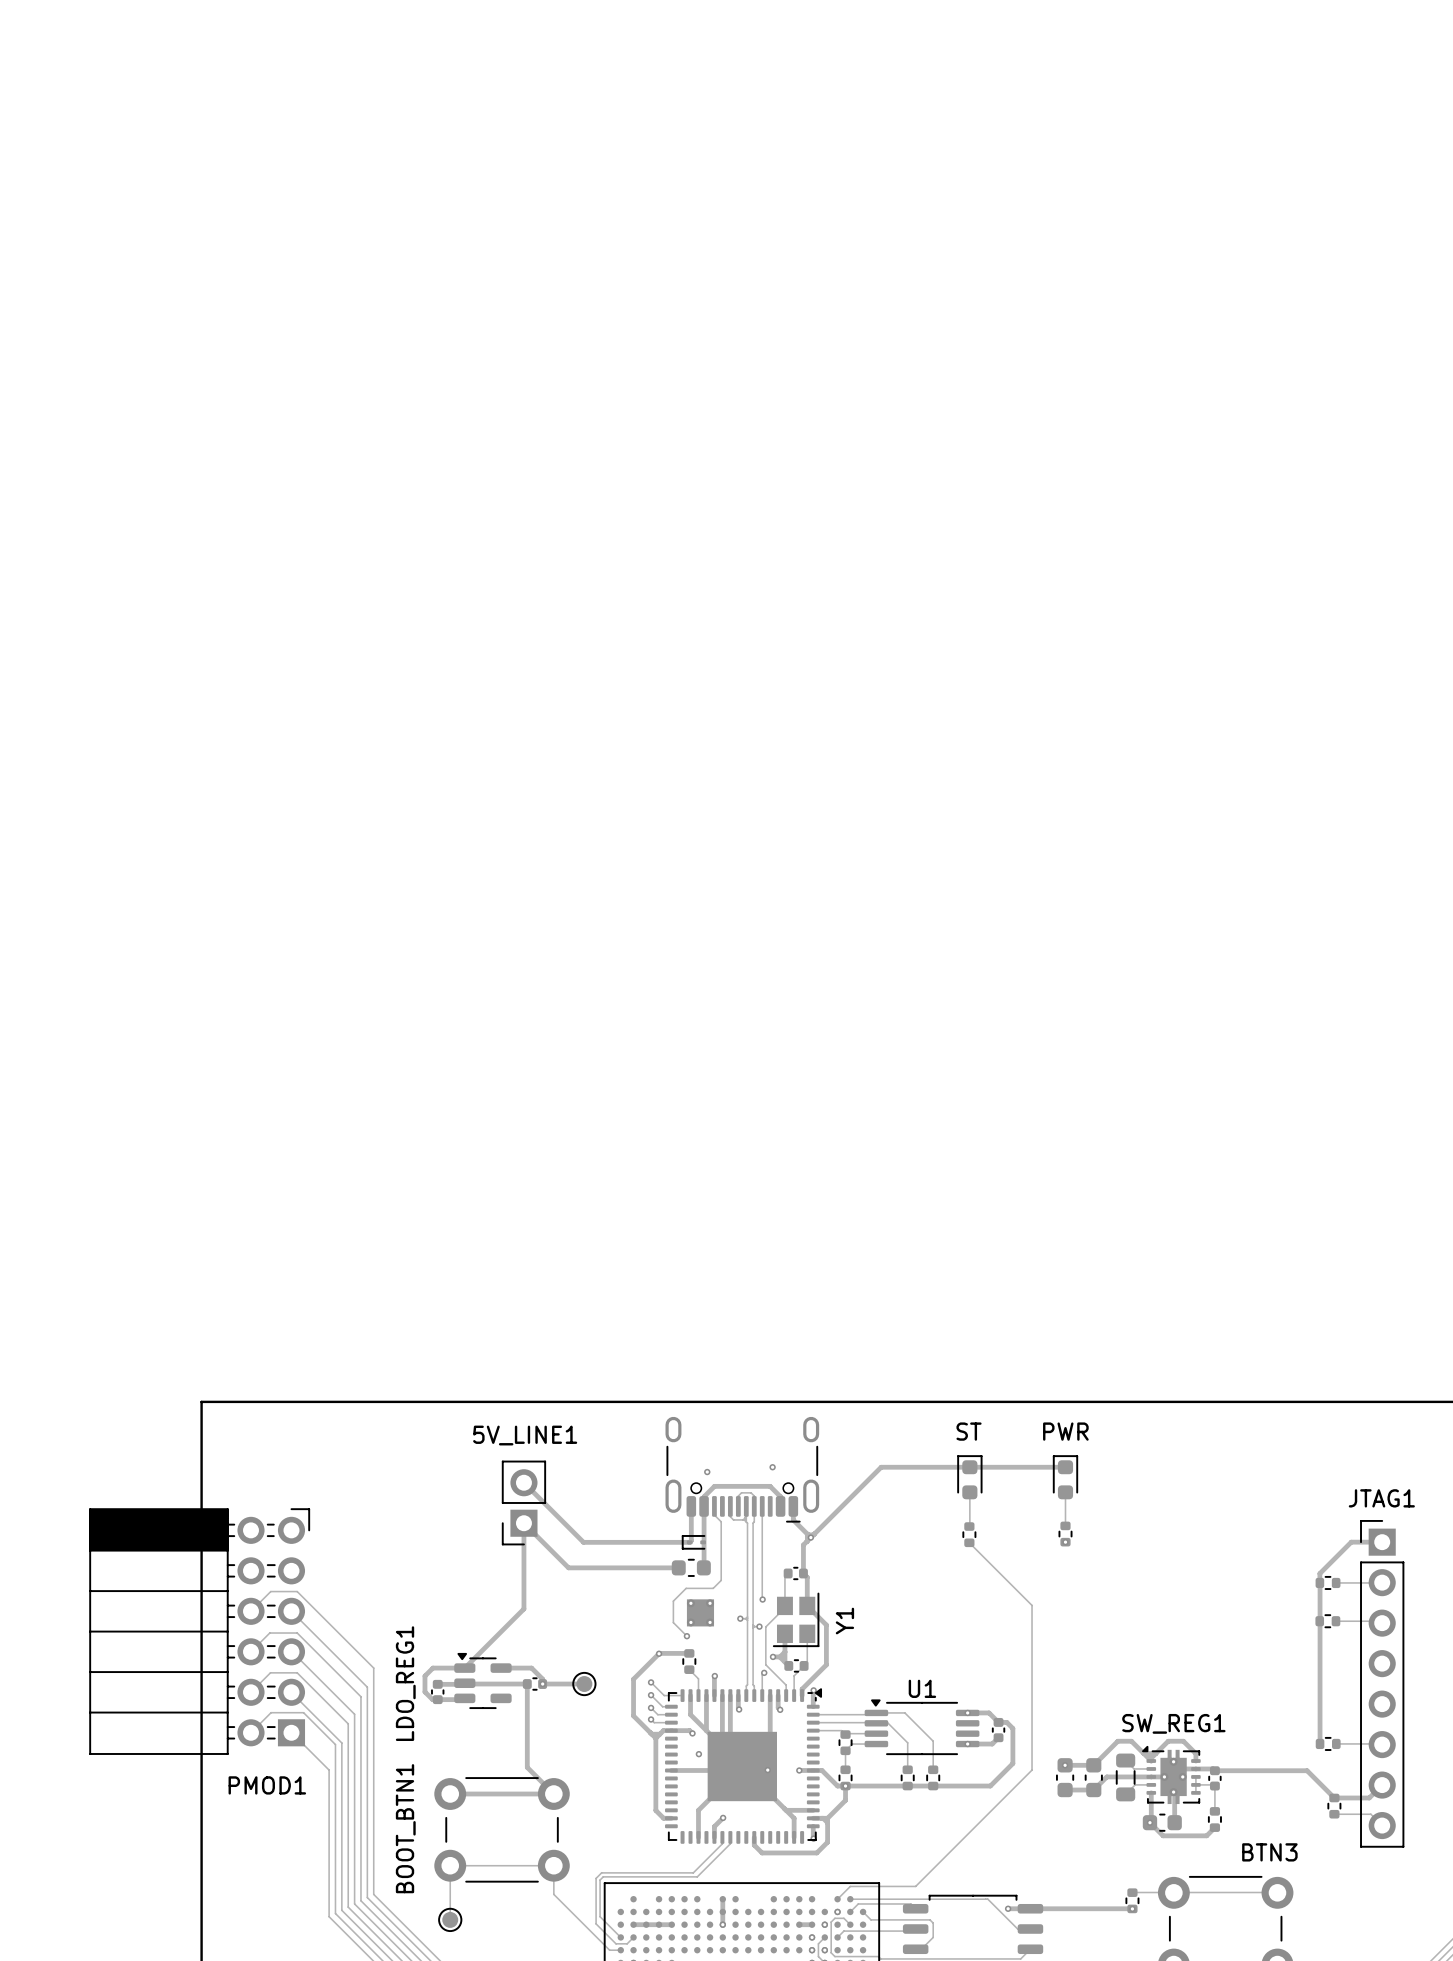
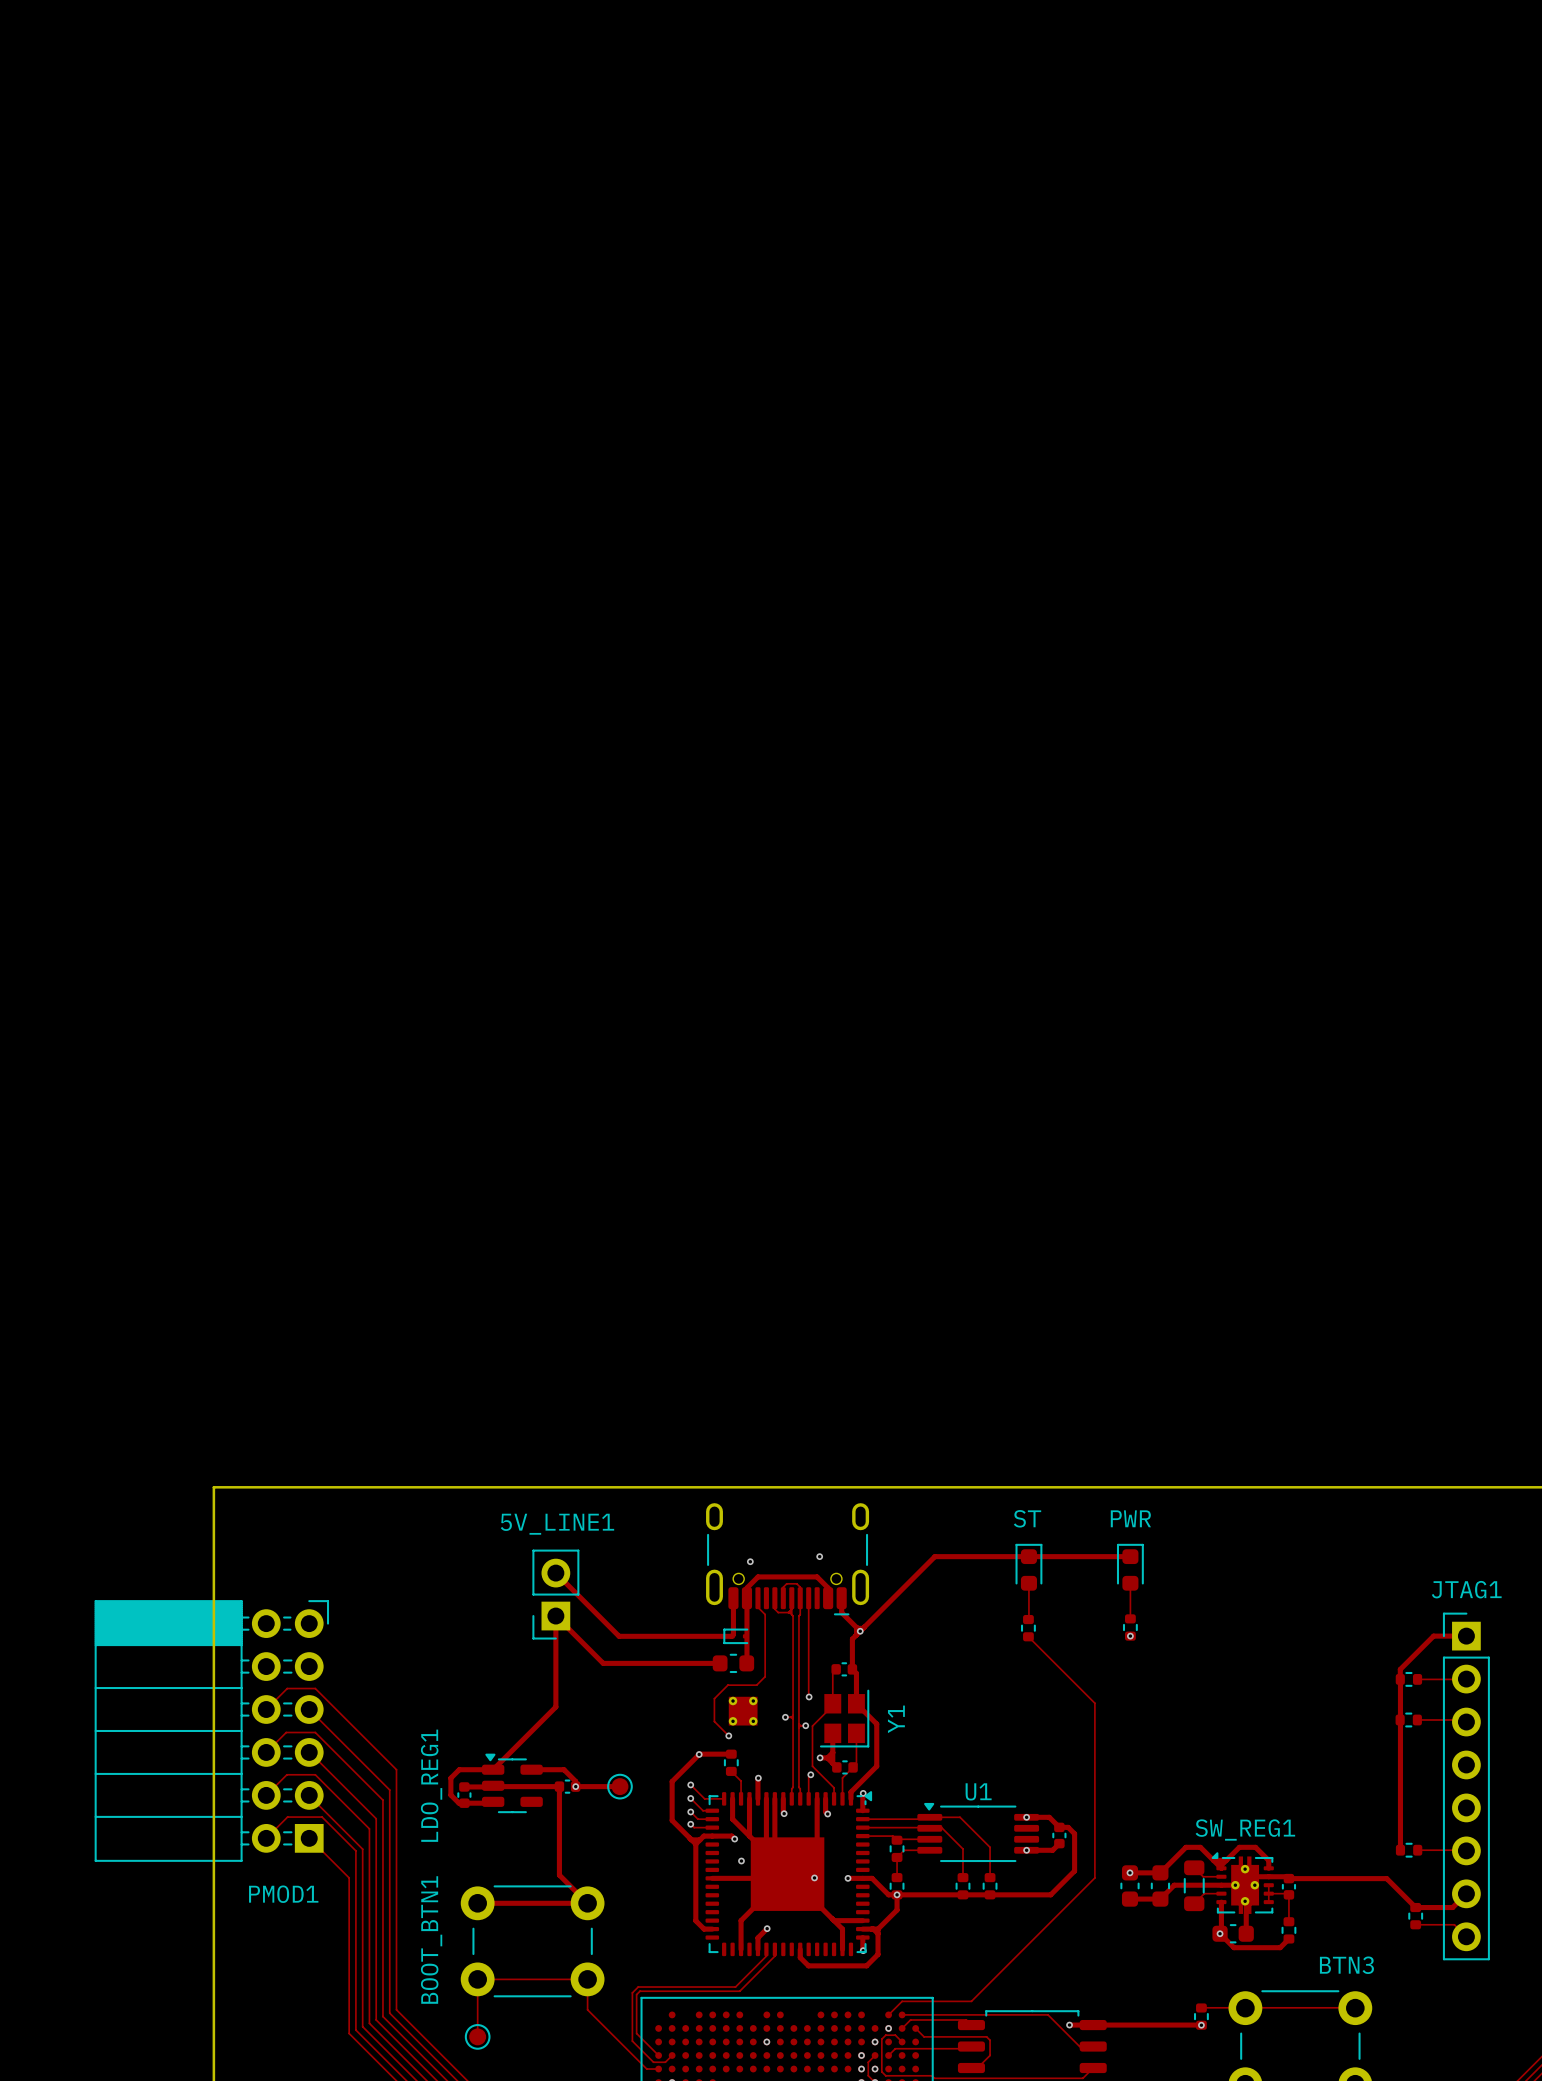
track: (722, 1899) (722, 1924) -> none
track: (633, 1924) (671, 1924) -> none
track: (799, 1924) (812, 1924) -> none

